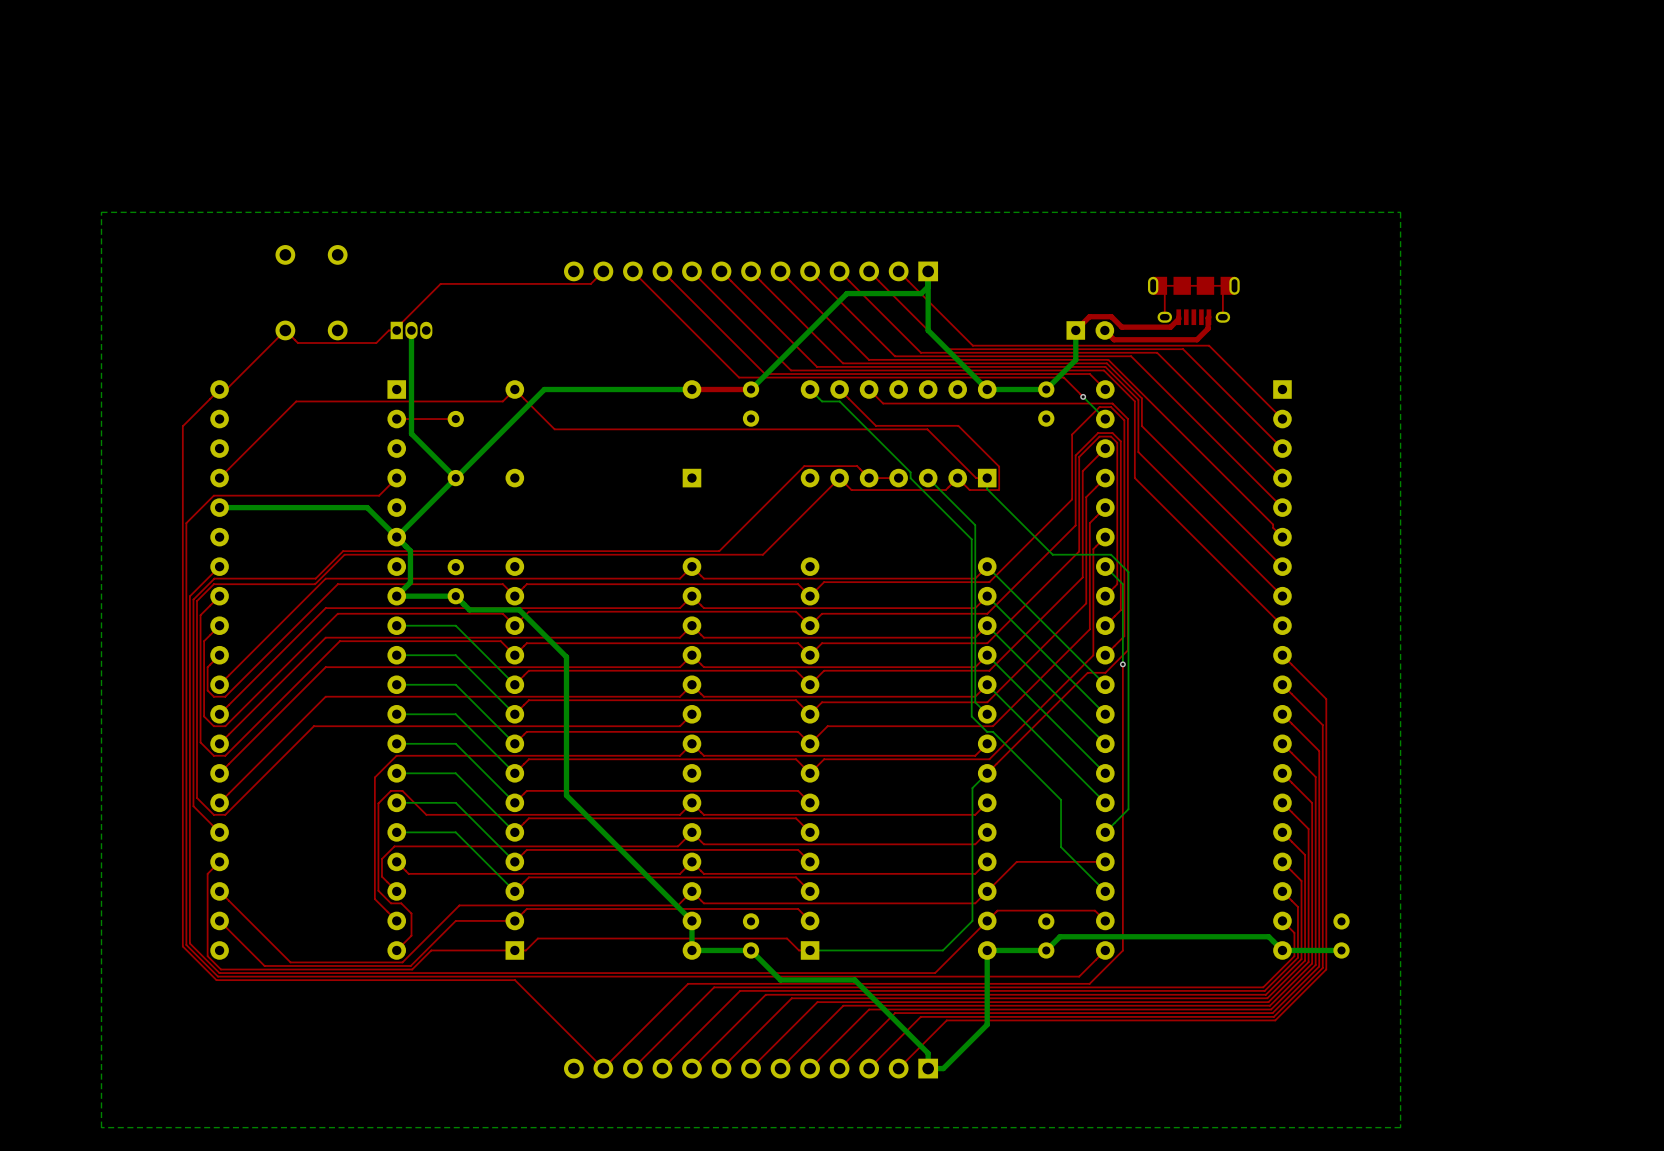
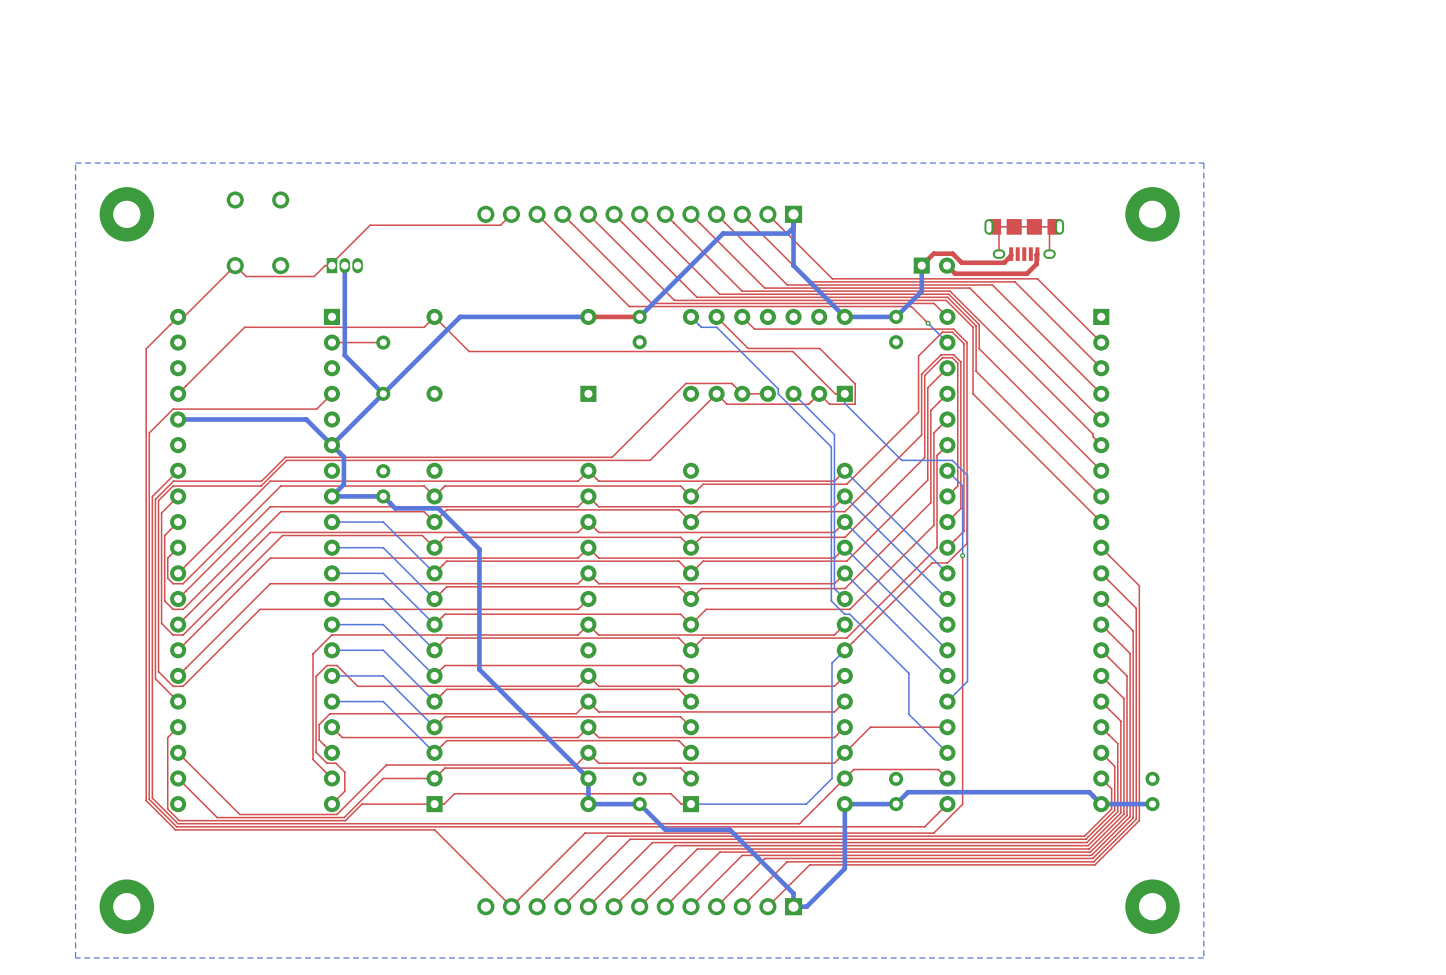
part: none -> (126, 214)
part: none -> (1152, 214)
part: none -> (126, 906)
part: none -> (1152, 906)

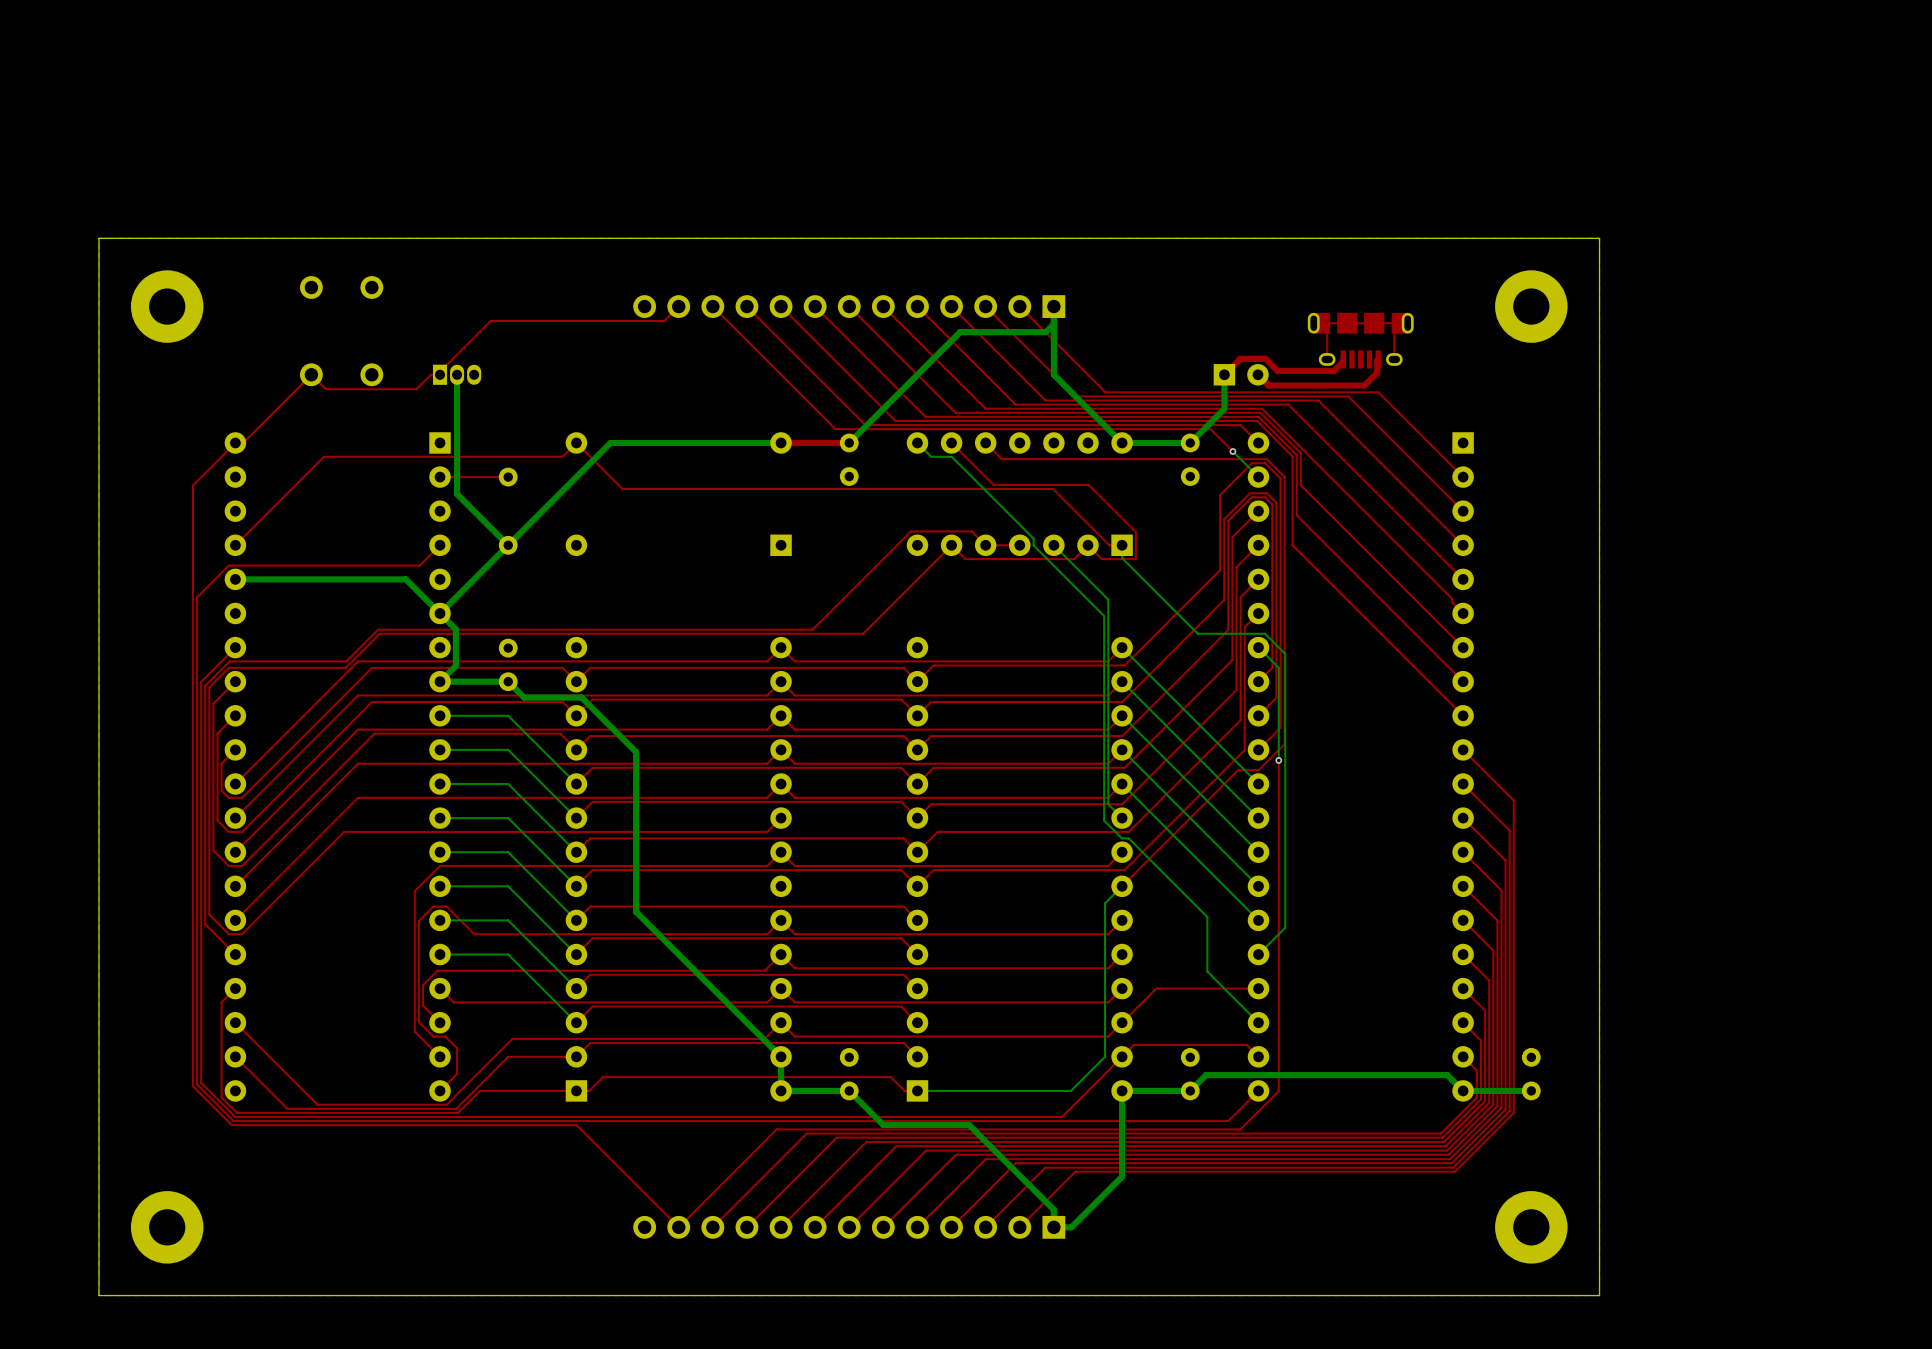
board edge: none -> (1599, 238) (1599, 1295) (98, 1295) (98, 238) (1599, 238)

